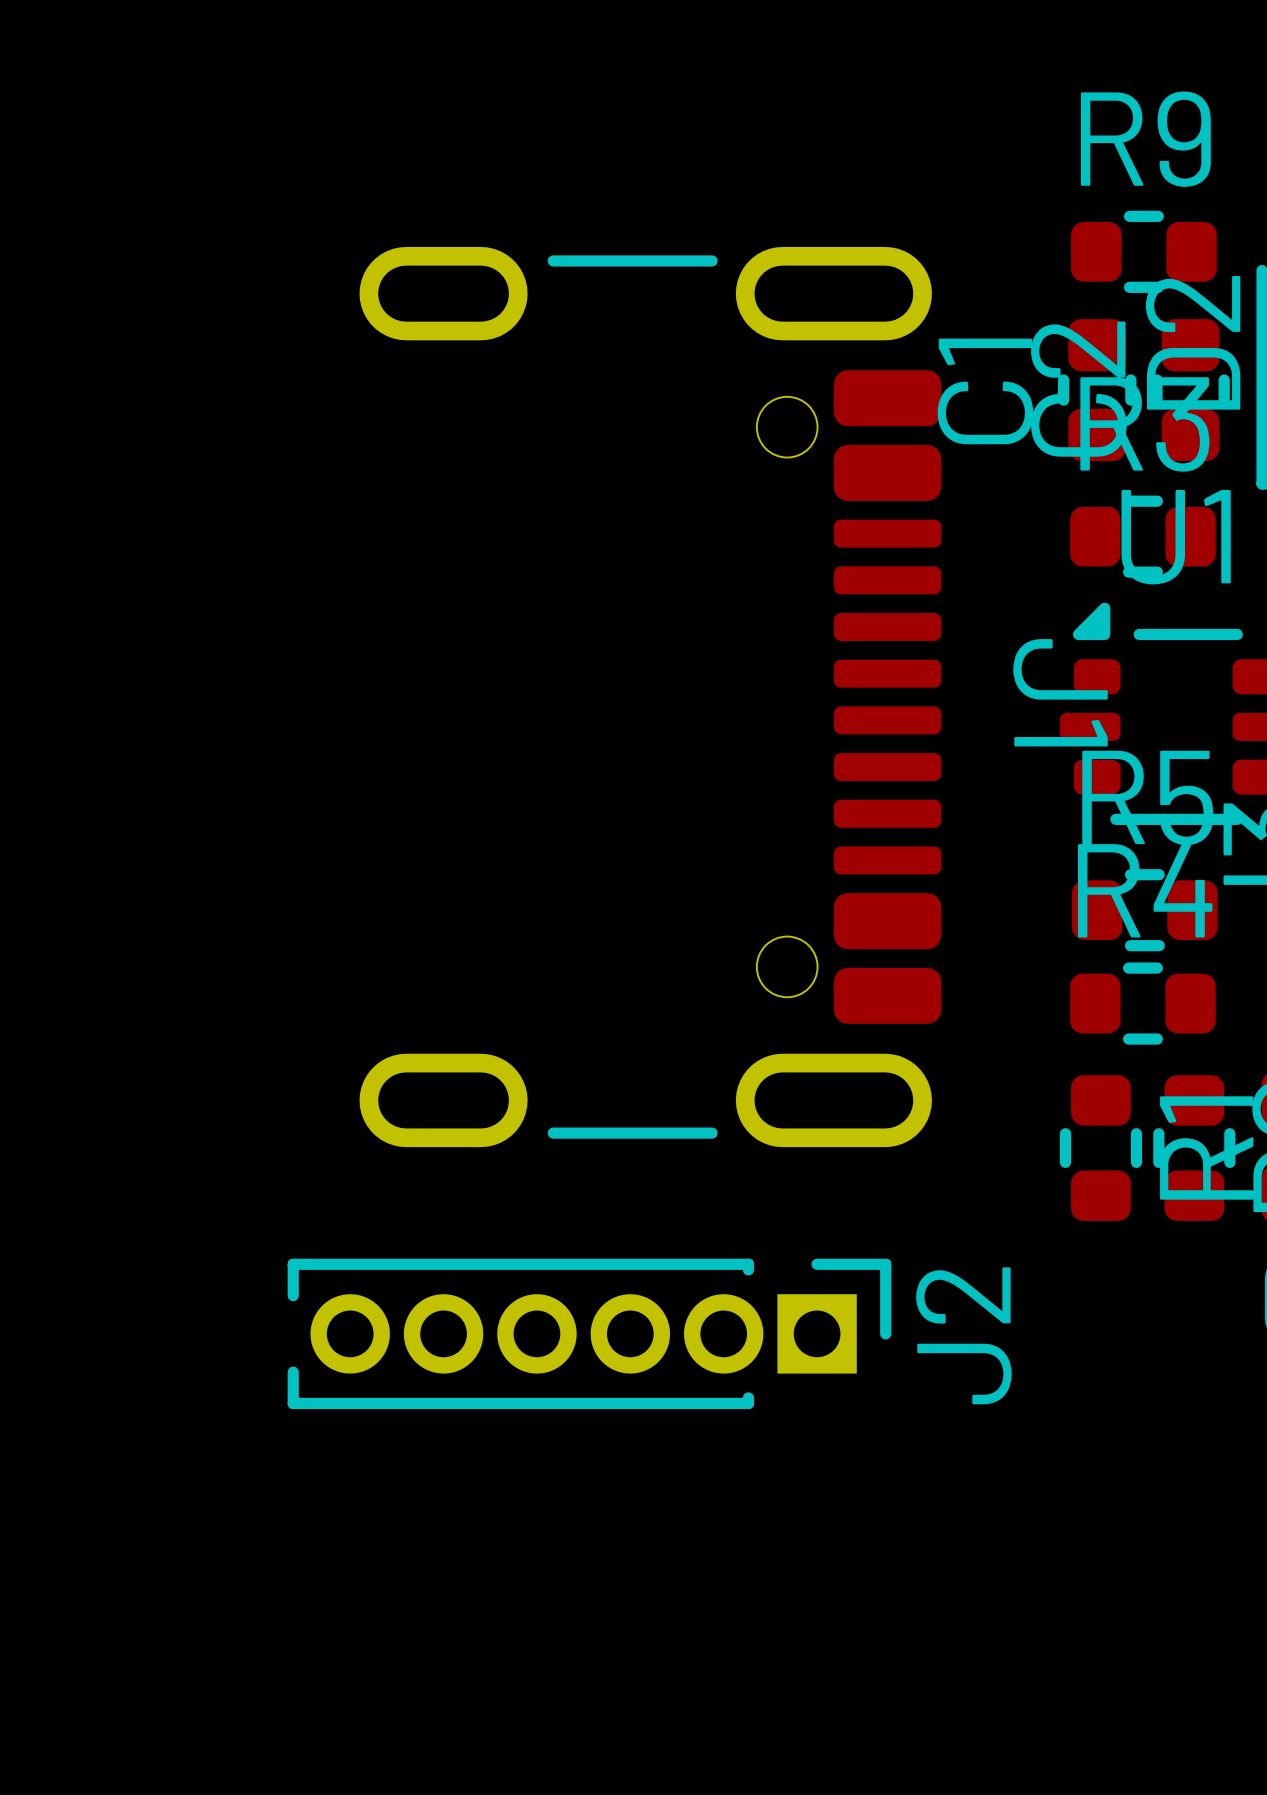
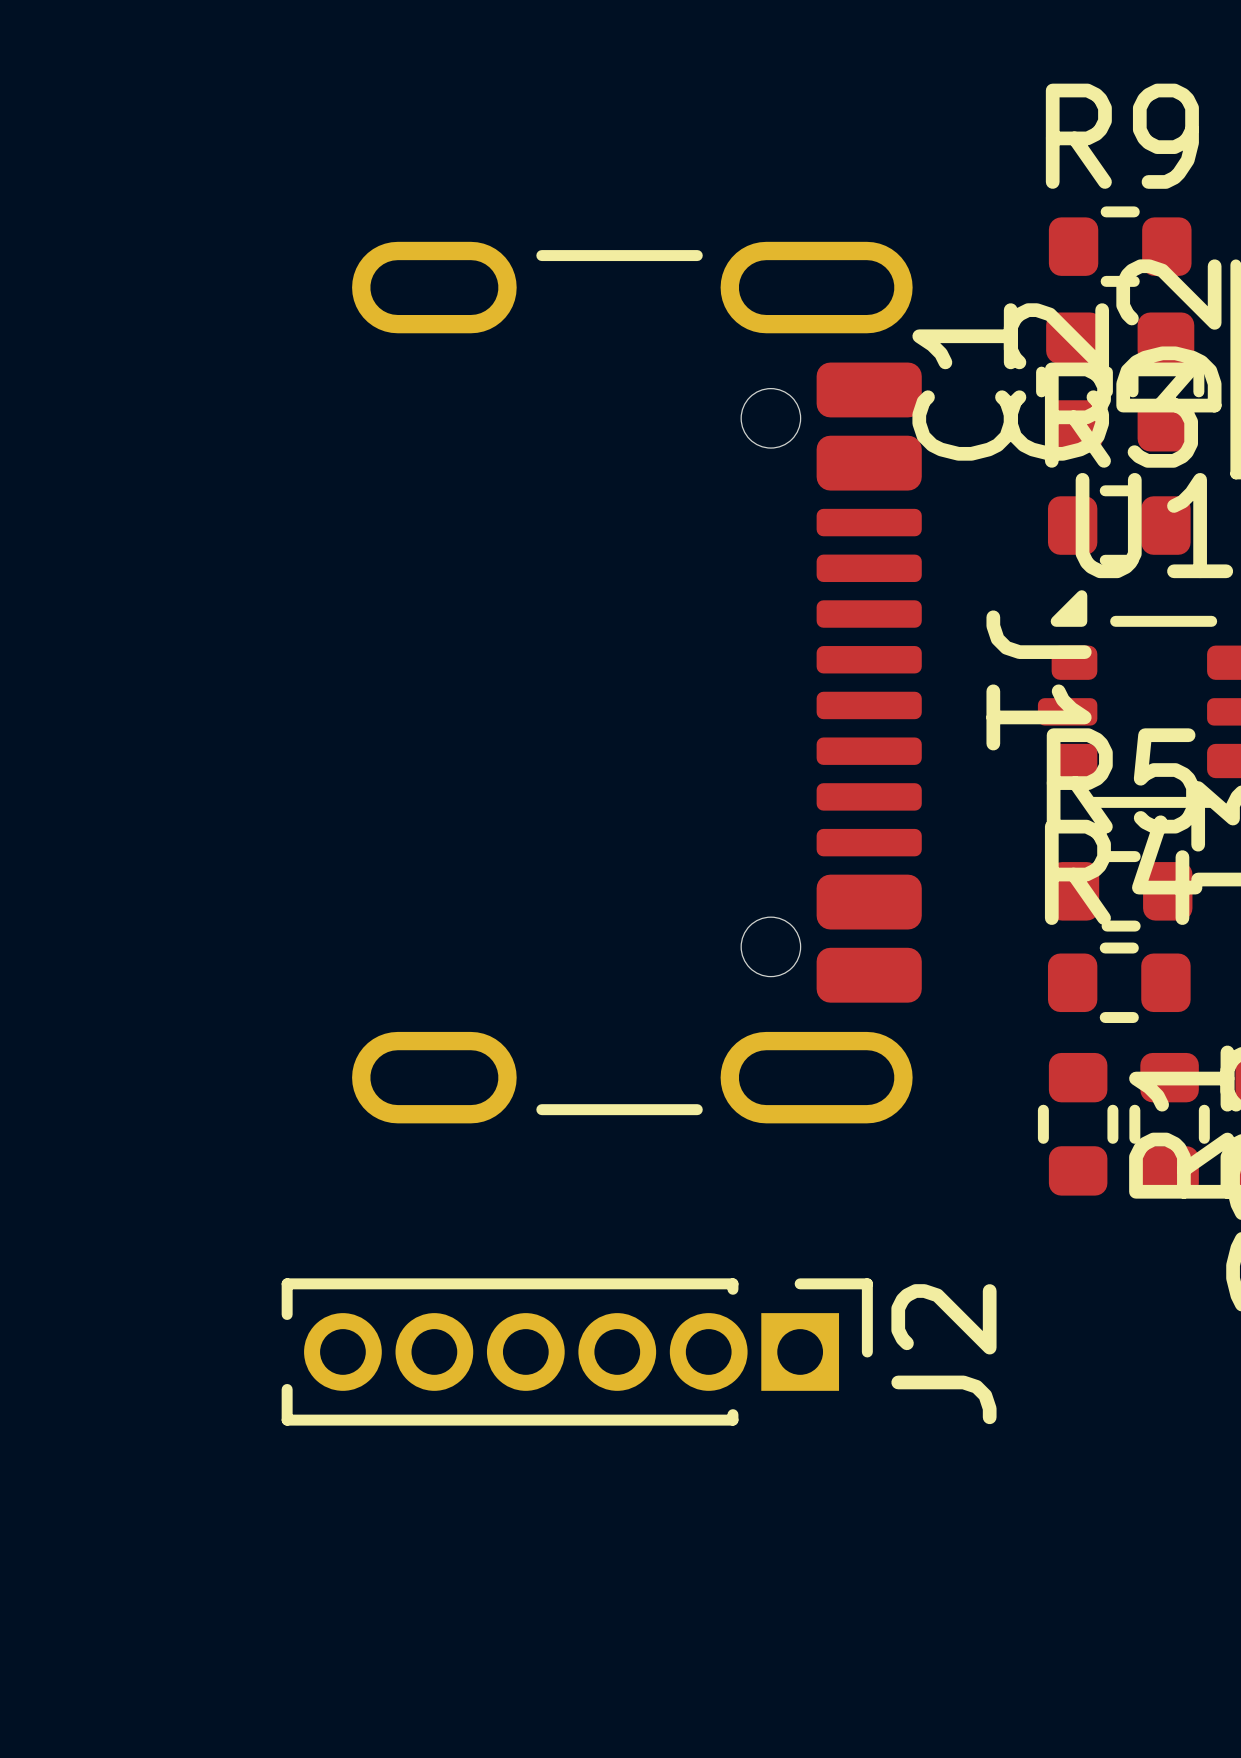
J2 position: (589, 1333) -> (577, 1351)

